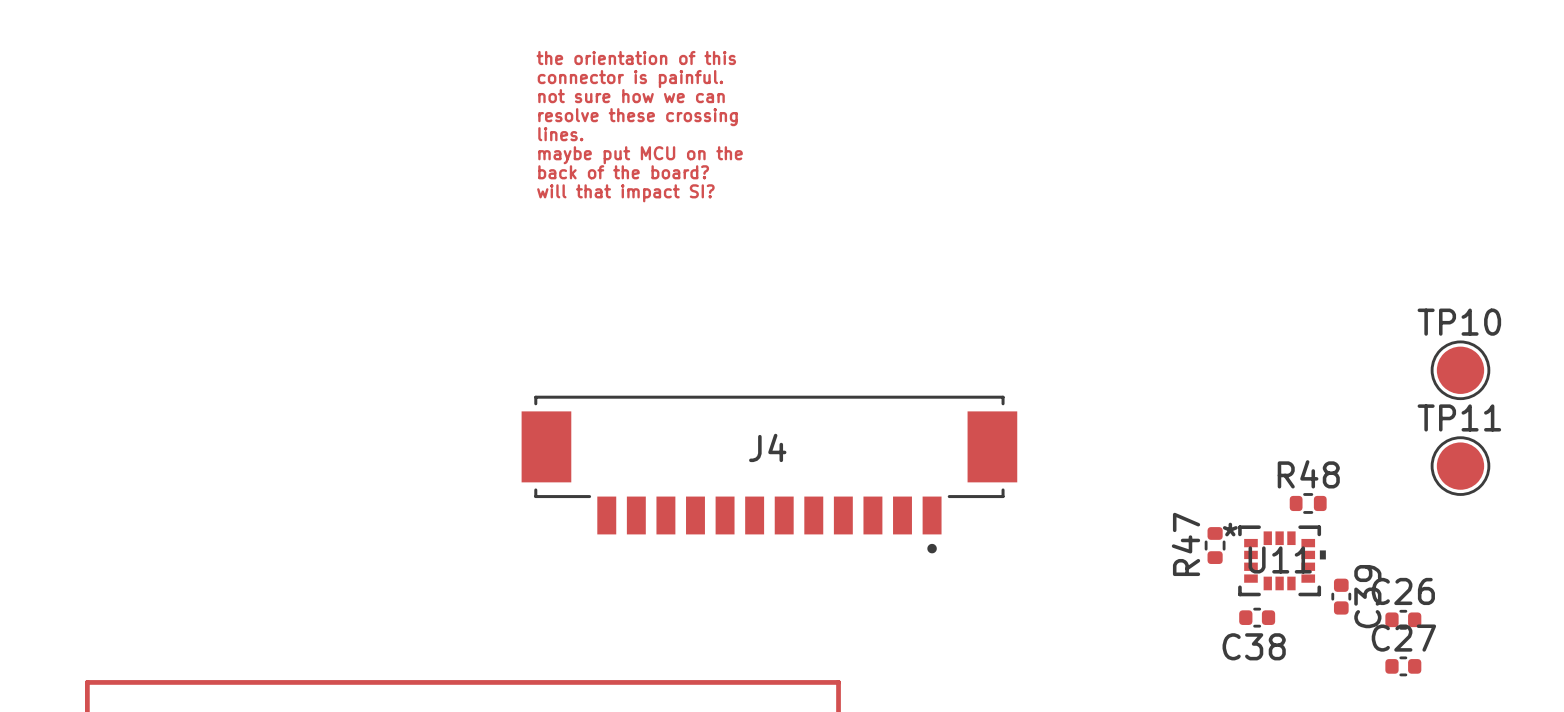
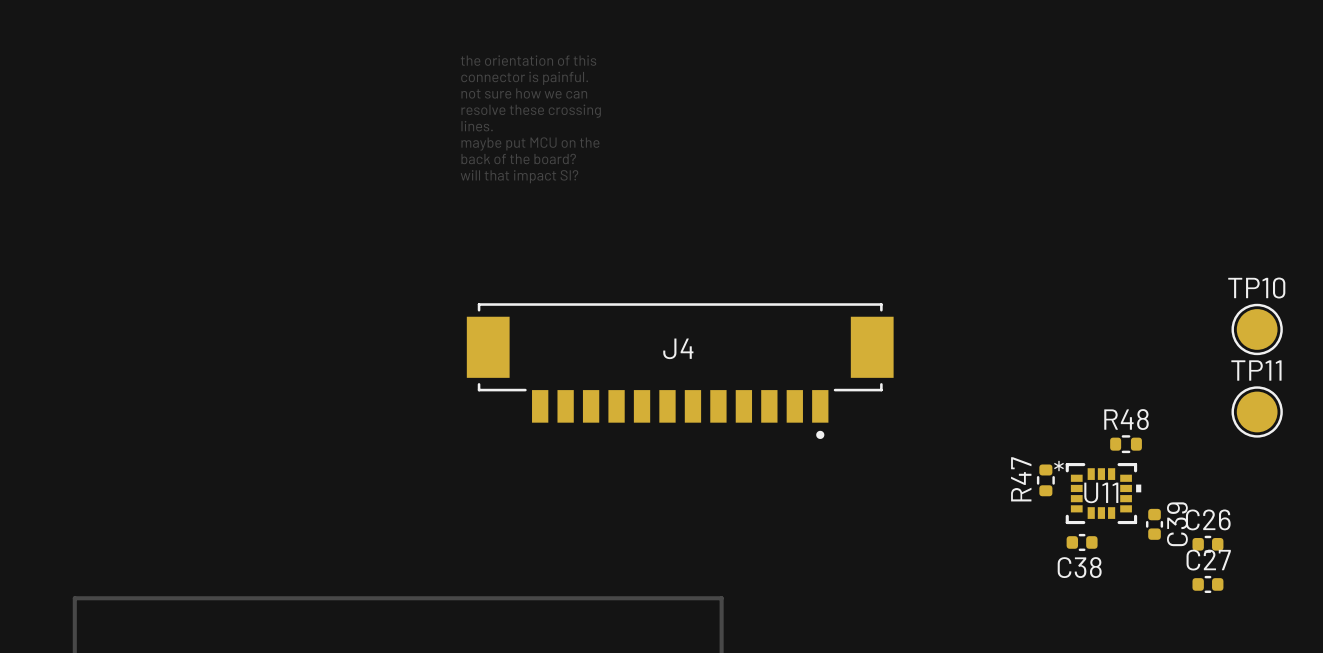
J4 position: (769, 474) -> (680, 371)

